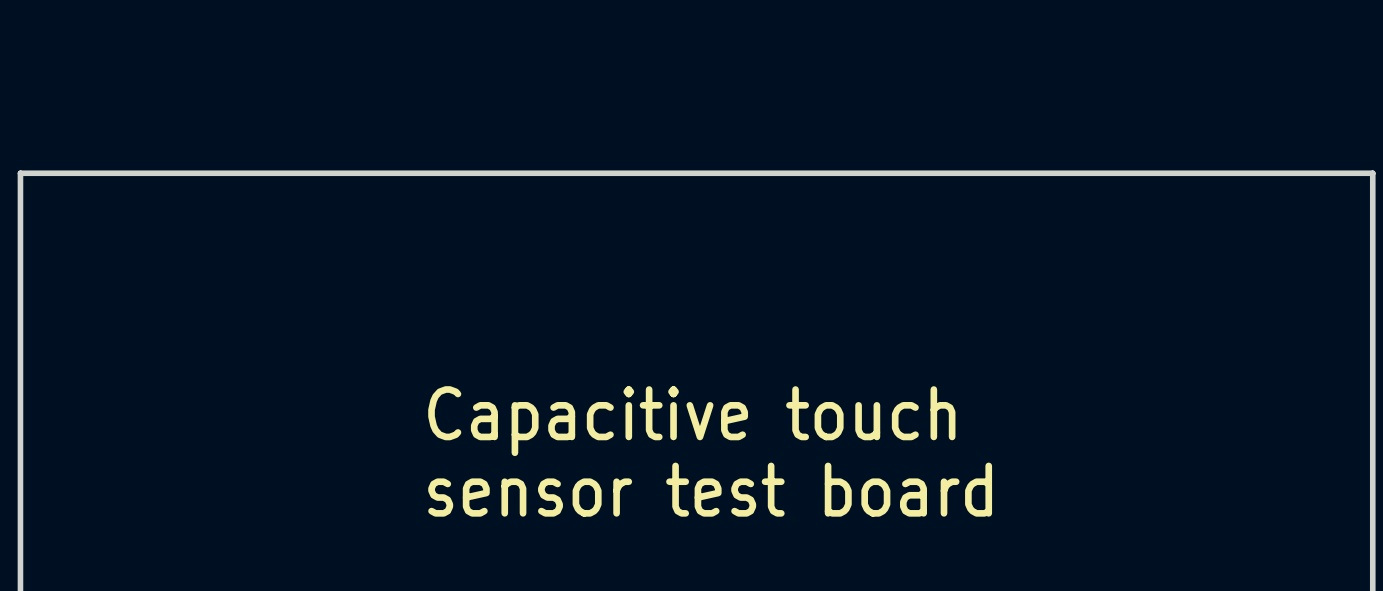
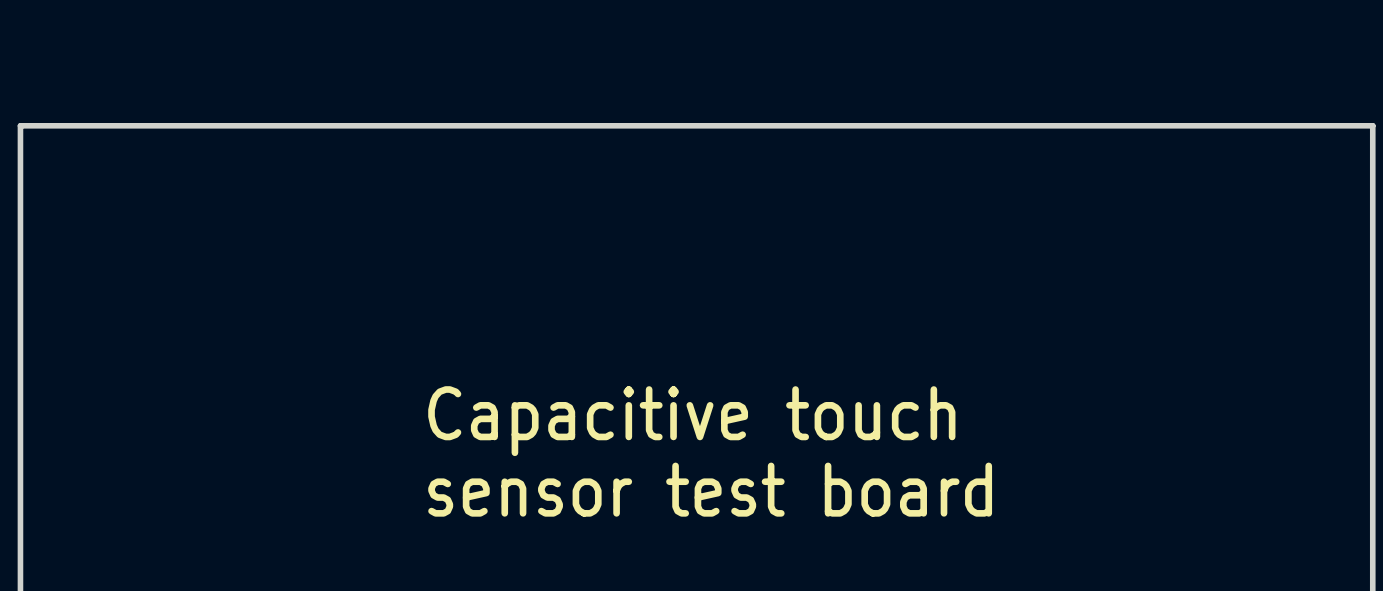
board edge: (1372, 173) (20, 173) -> (1372, 173) (1372, 125) (20, 125) (20, 173)

